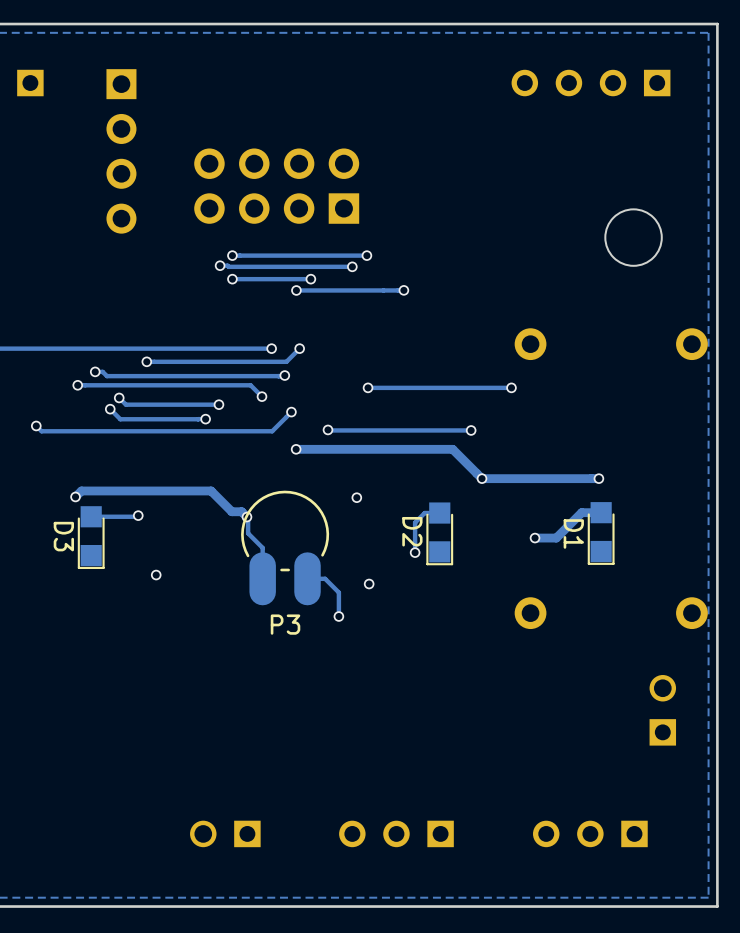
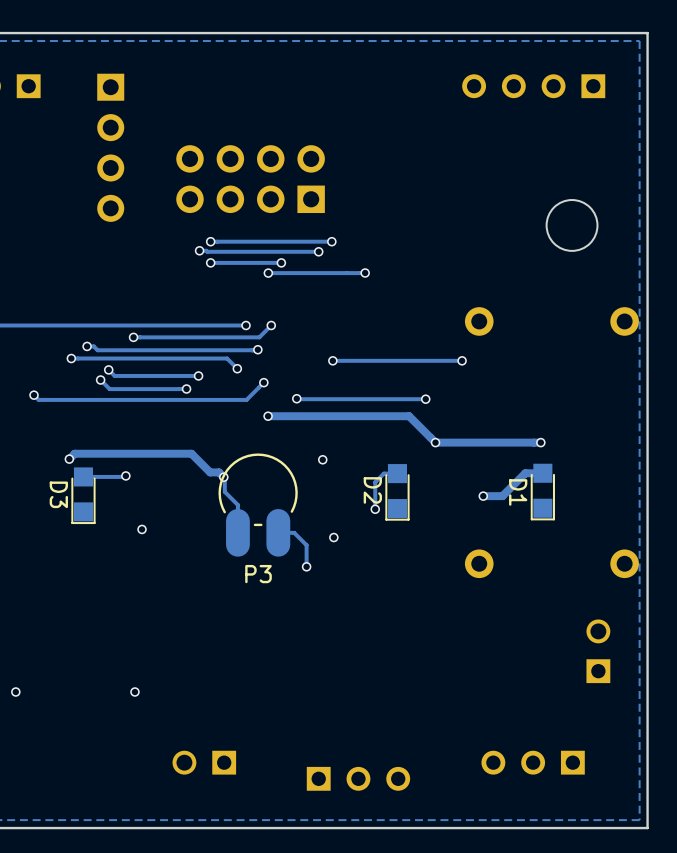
via: none -> (15, 691)
via: none -> (134, 691)
part rotation: 0° (396, 833) -> 180° (358, 778)

